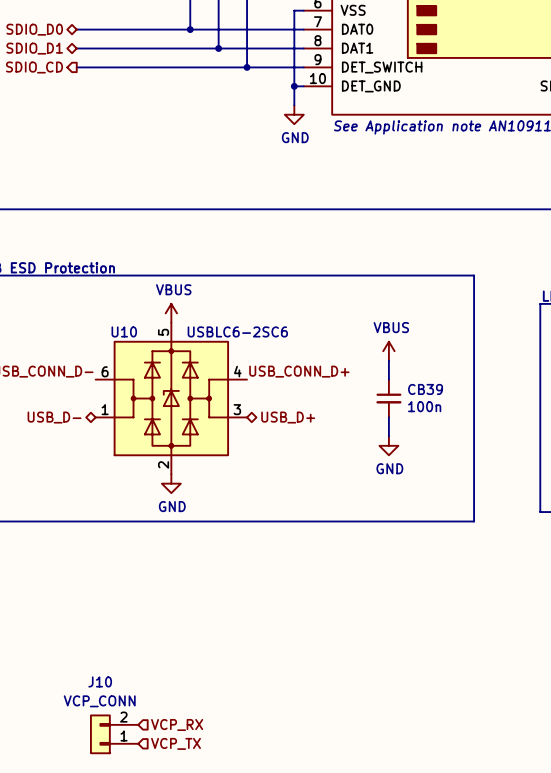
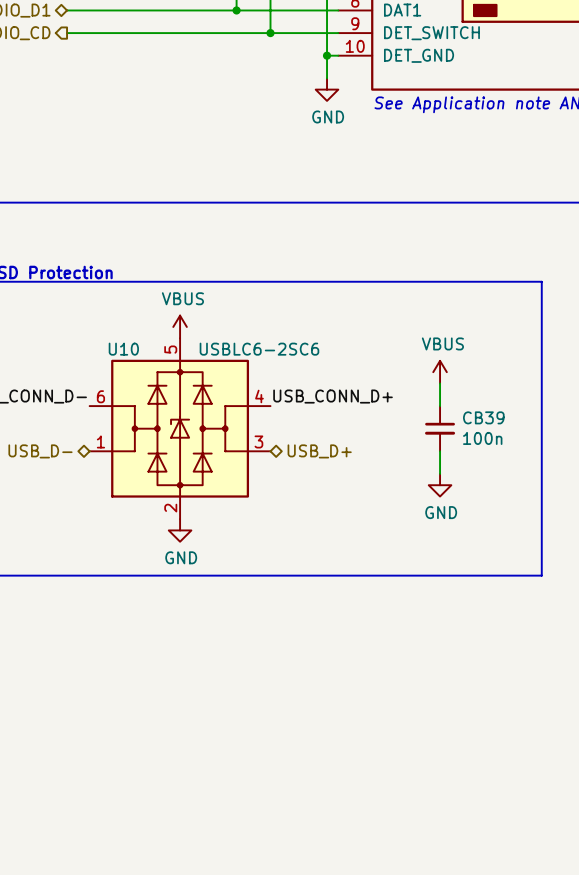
hierarchical label: VCP_RX (177, 724) -> none
J10: VCP_CONN (114, 734) -> none
hierarchical label: VCP_TX (176, 743) -> none

